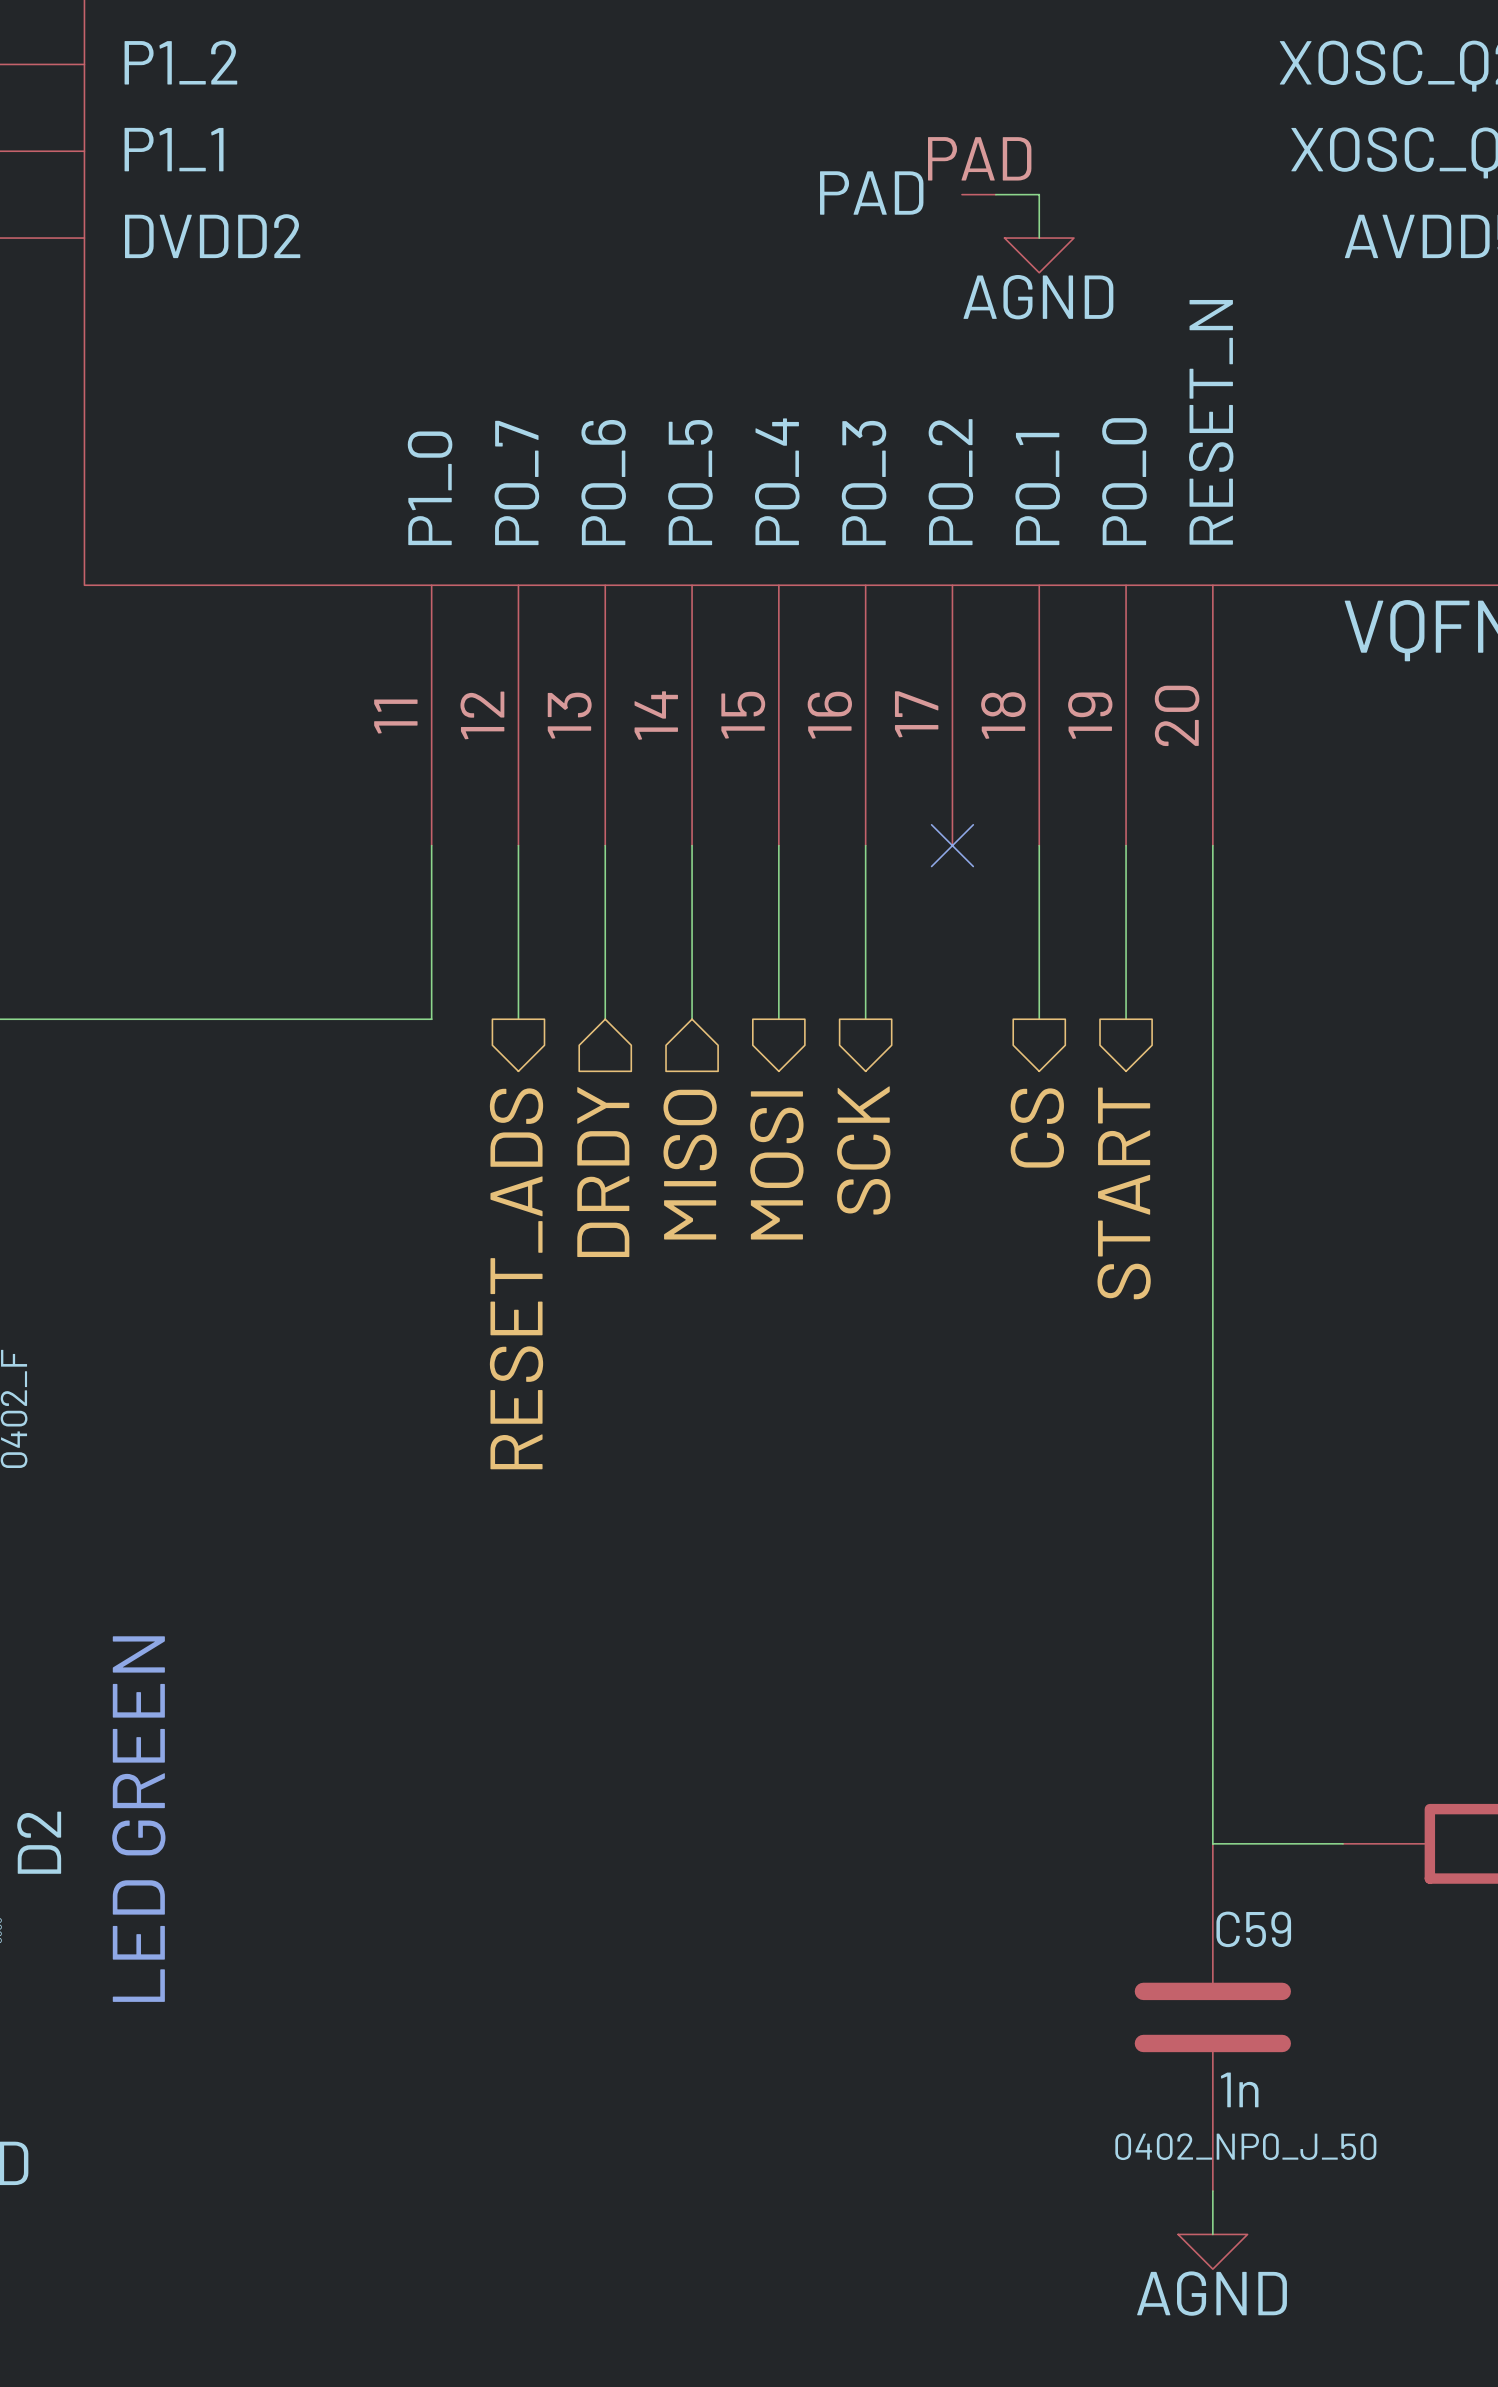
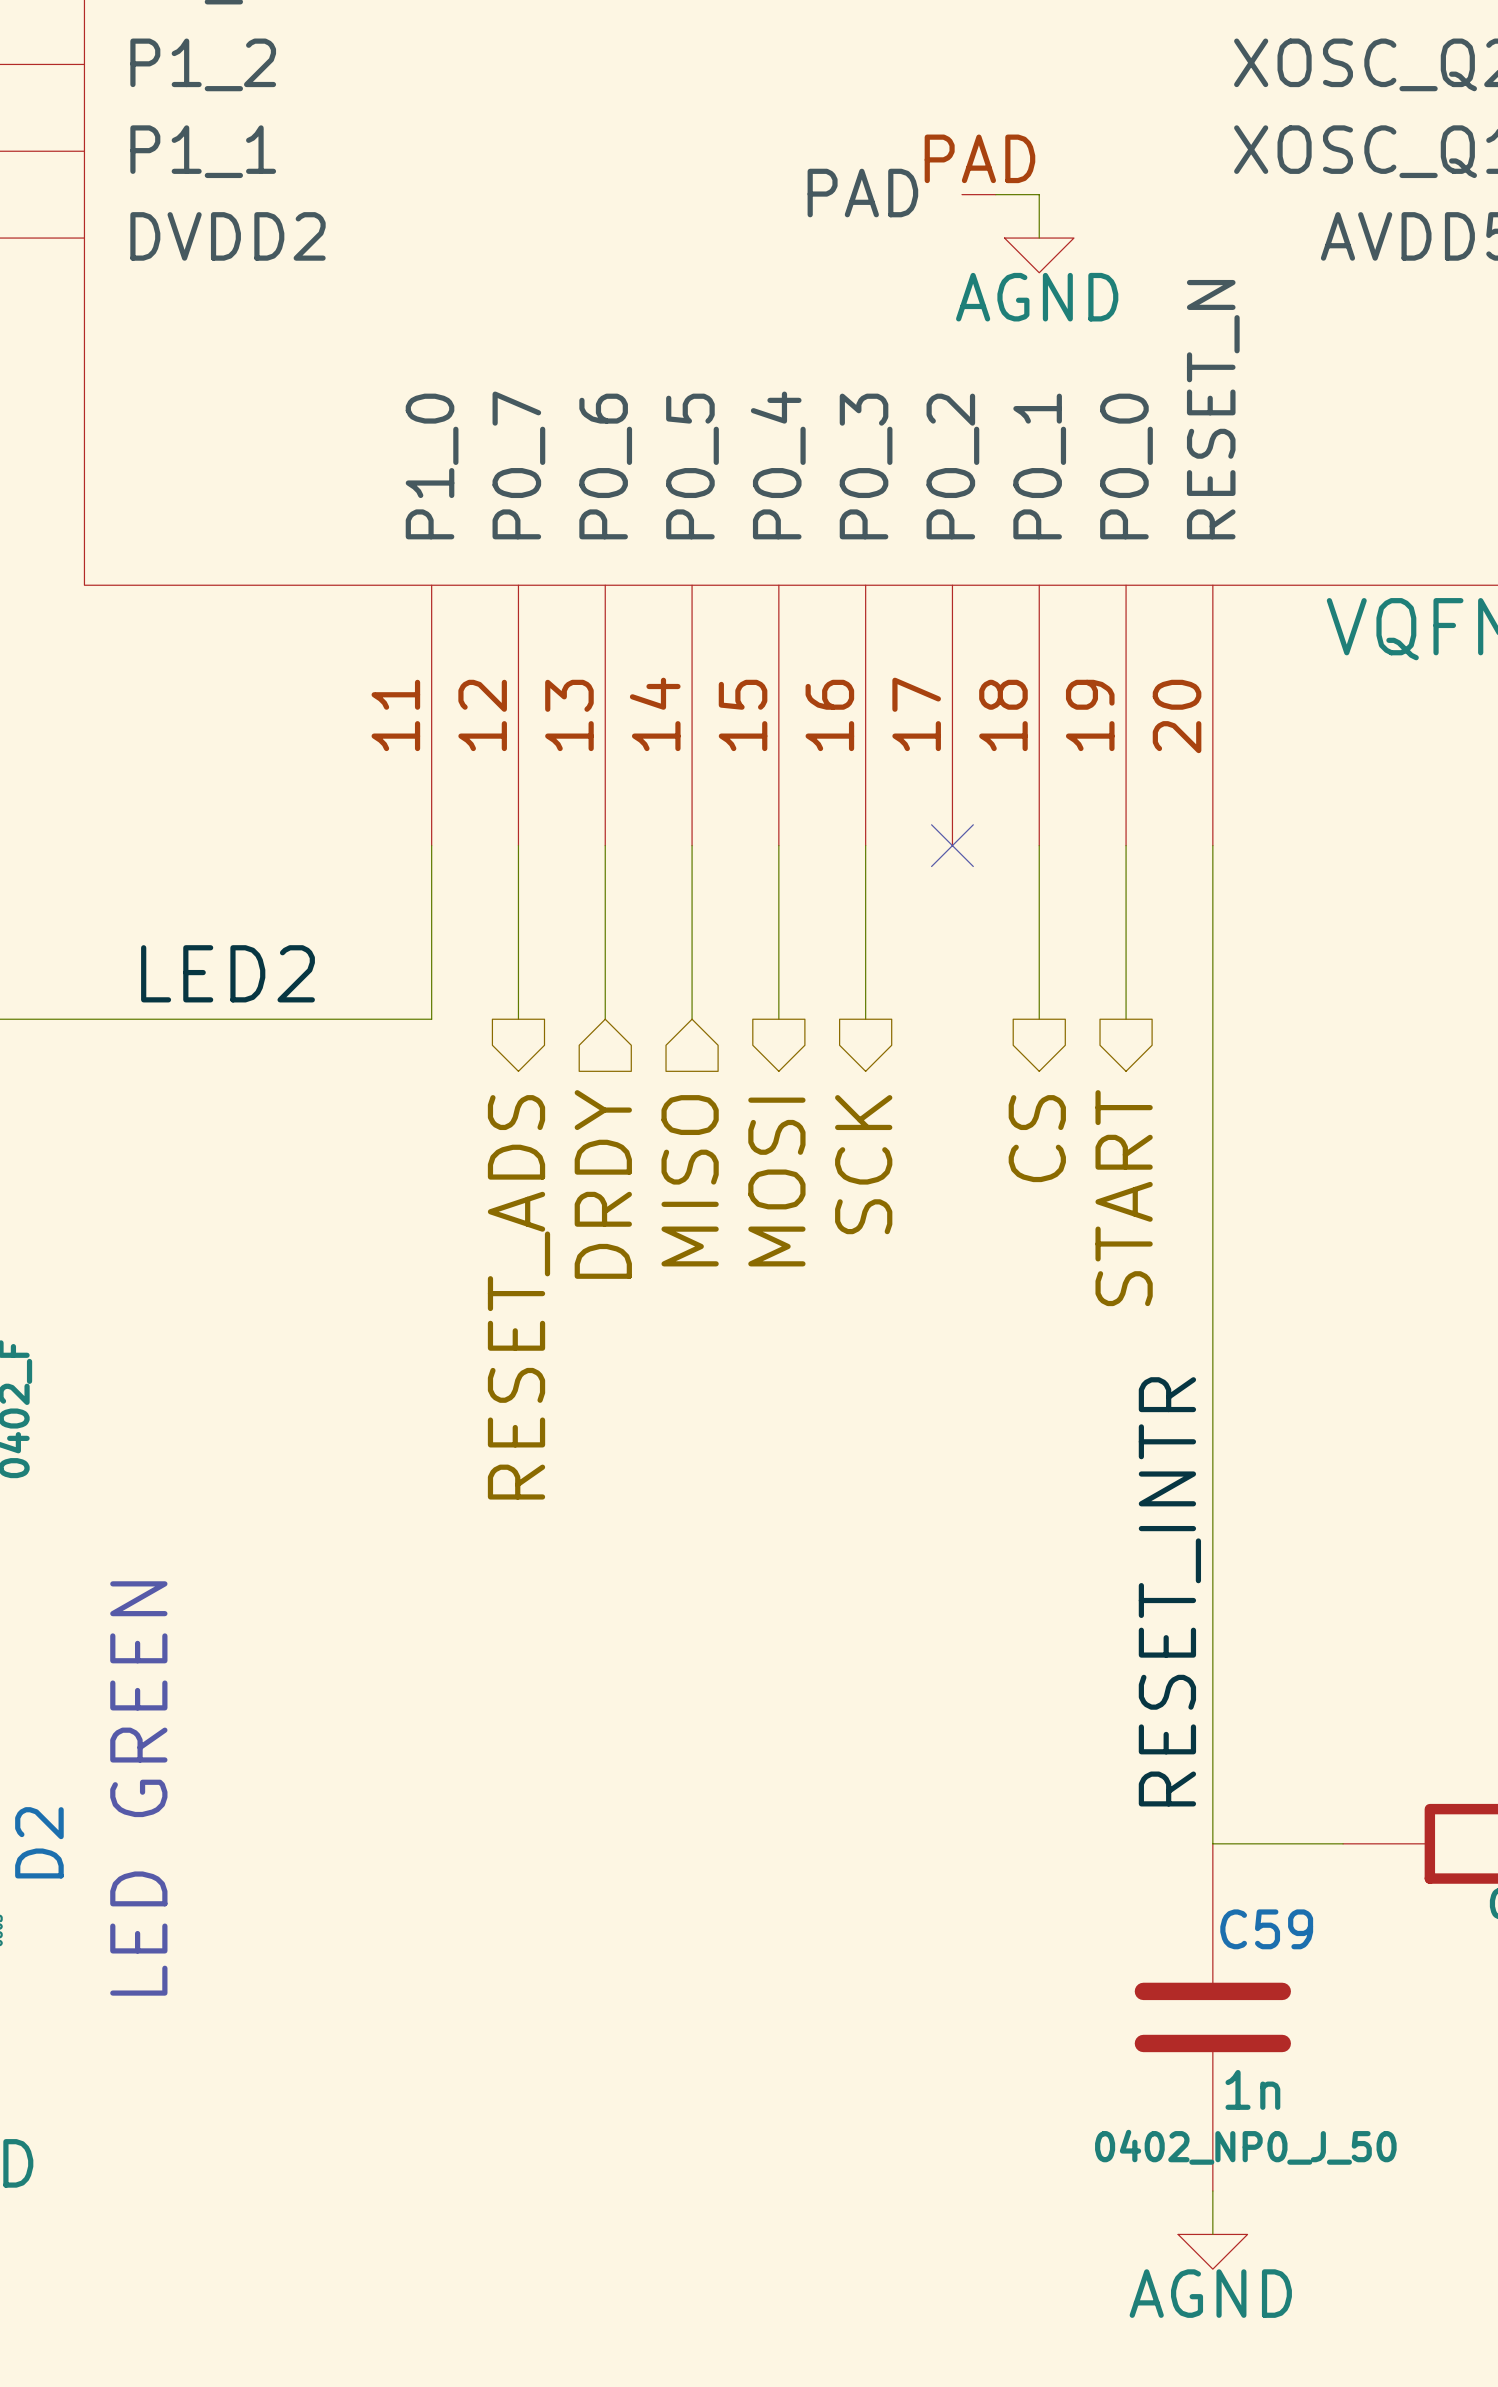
label: none -> LED2 (228, 973)
label: none -> RESET_INTR (1169, 1591)

